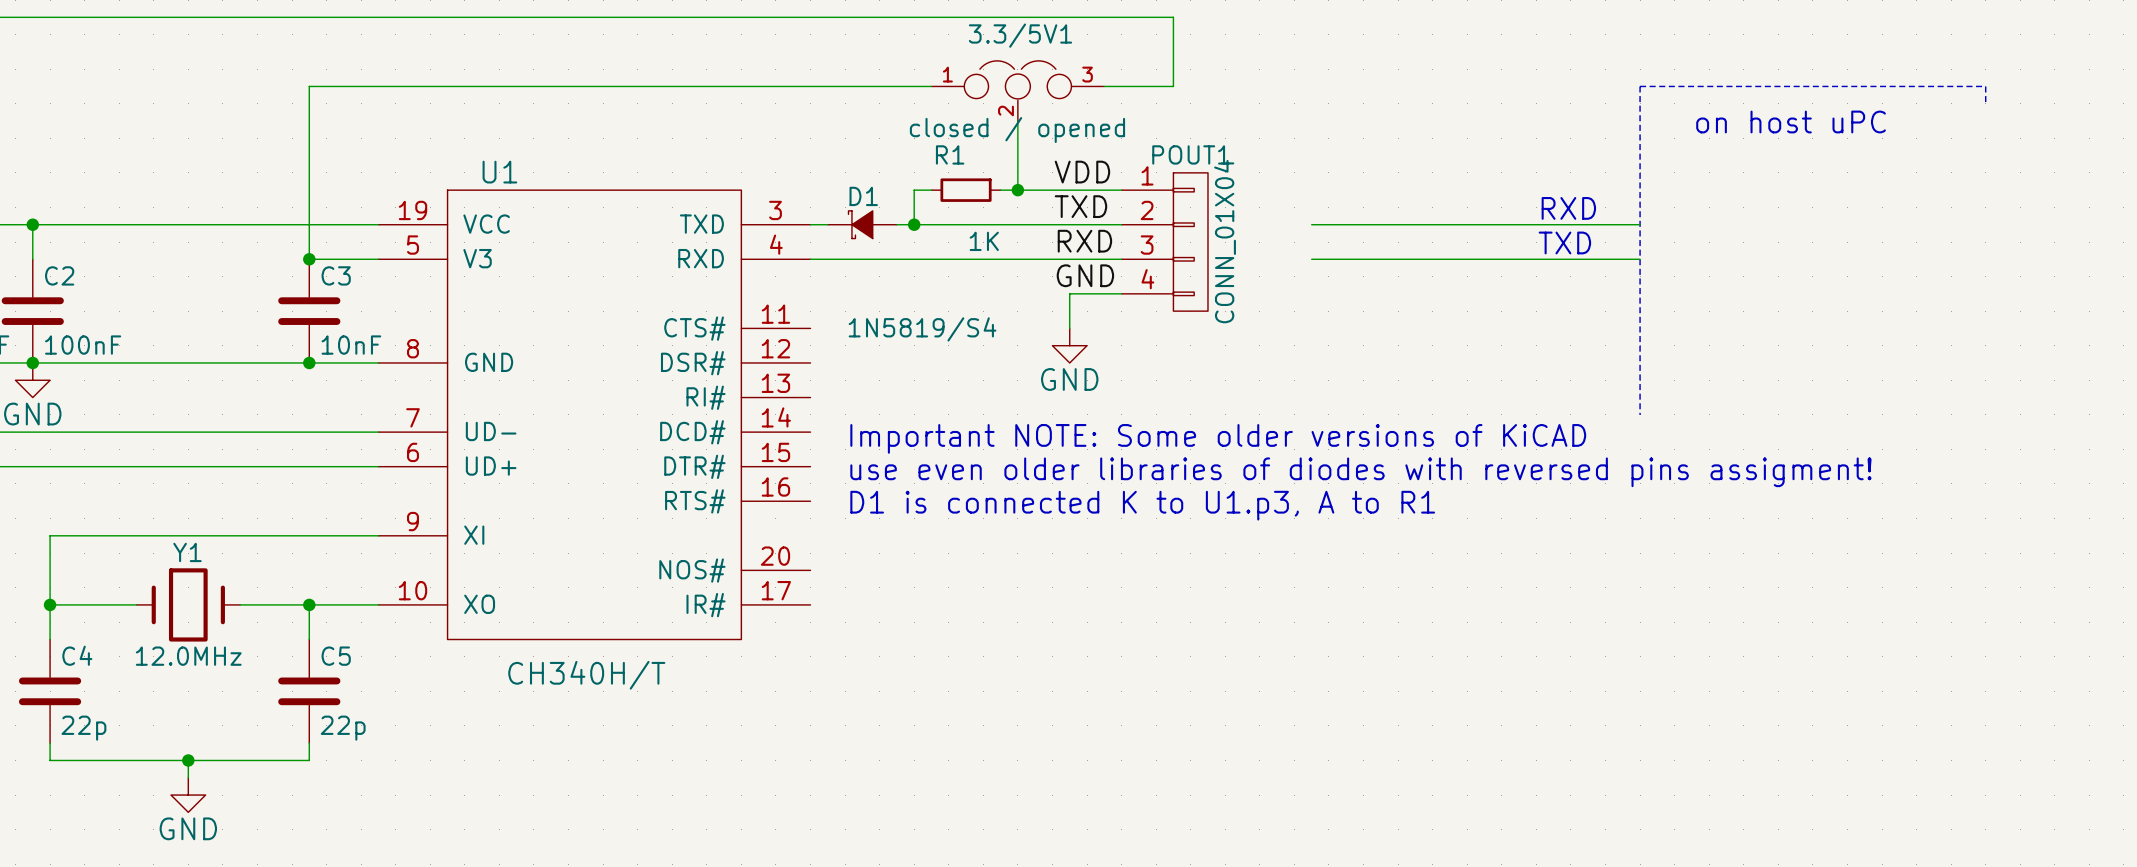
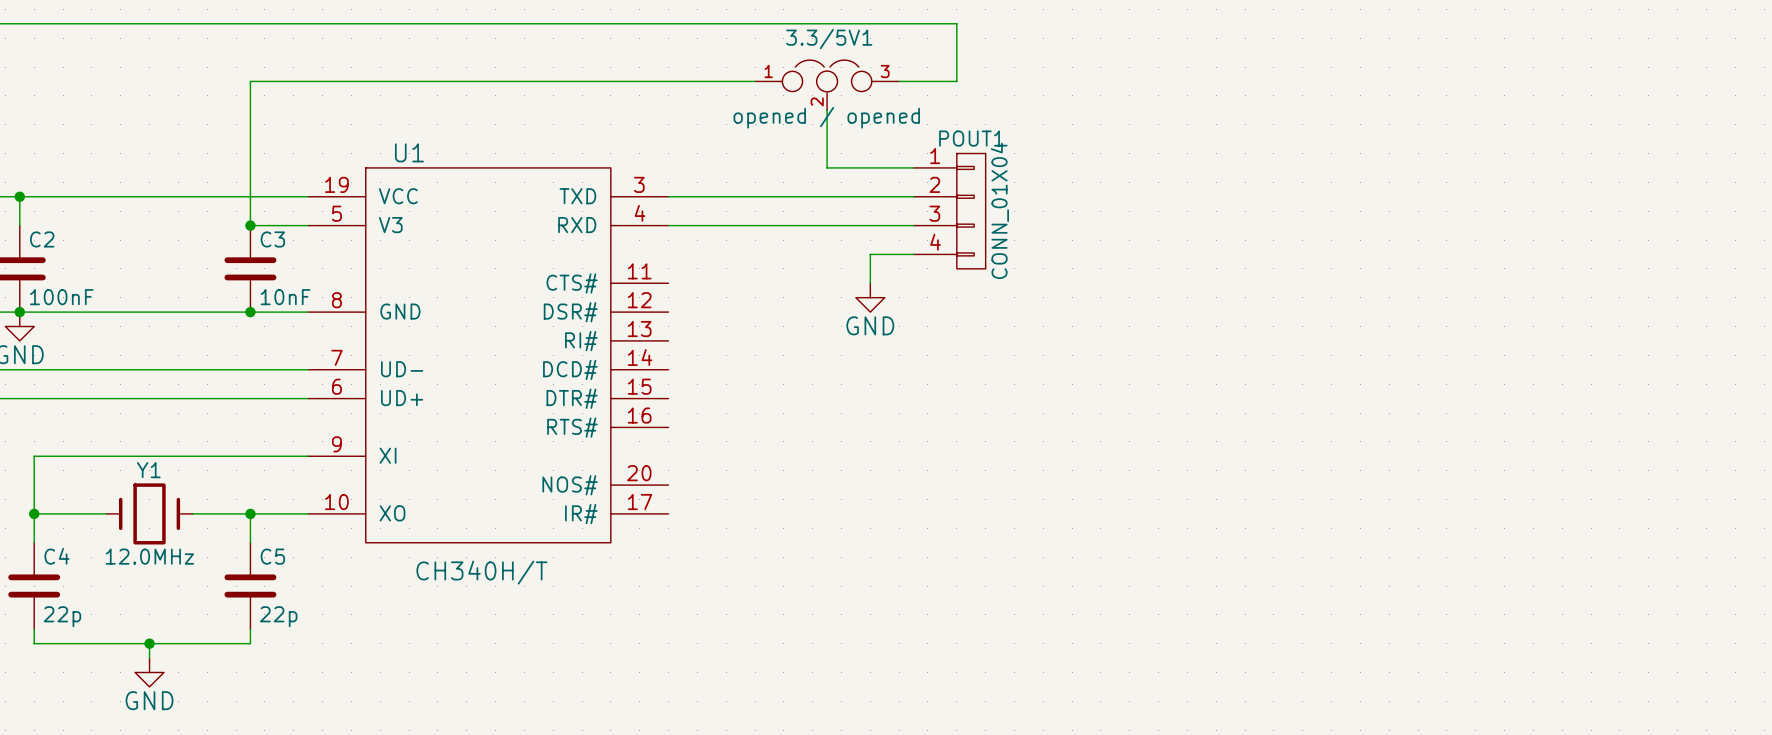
wire: (1156, 17) (1173, 17) (1173, 86) (1156, 86) -> (956, 23) (956, 81)
3.3/5V1 position: (1017, 90) -> (827, 85)
line: (1985, 103) (1985, 86) (1640, 86) (1640, 414) -> none
wire: (1017, 121) (1017, 190) -> (827, 110) (827, 167)
text: on host uPC (1791, 121) -> none
3.3/5V1 value: closed / opened (1017, 130) -> opened / opened (826, 117)
label: VDD (1082, 172) -> none
wire: (931, 190) (914, 190) (914, 224) -> none
R1: 1K (966, 190) -> none
junction: (1017, 190) -> none
label: TXD (1080, 206) -> none
text: RXD (1568, 208) -> none
D1: 1N5819/S4 (862, 224) -> none
junction: (914, 224) -> none
wire: (1311, 224) (1640, 224) -> none
label: RXD (1084, 241) -> none
POUT1 position: (1164, 242) -> (949, 211)
text: TXD (1564, 242) -> none
wire: (1311, 259) (1640, 259) -> none
label: GND (1085, 275) -> none
wire: (1069, 293) (1069, 328) -> (884, 254) (870, 254) (870, 283)
power symbol position: GND (1069, 345) -> GND (870, 297)
text: Important NOTE: Some older versions of KiCAD (1218, 438) -> none
text: use even older libraries of diodes with reversed pins assigment! (1360, 472) -> none
text: D1 is connected K to U1.p3, A to R1 (1142, 505) -> none

